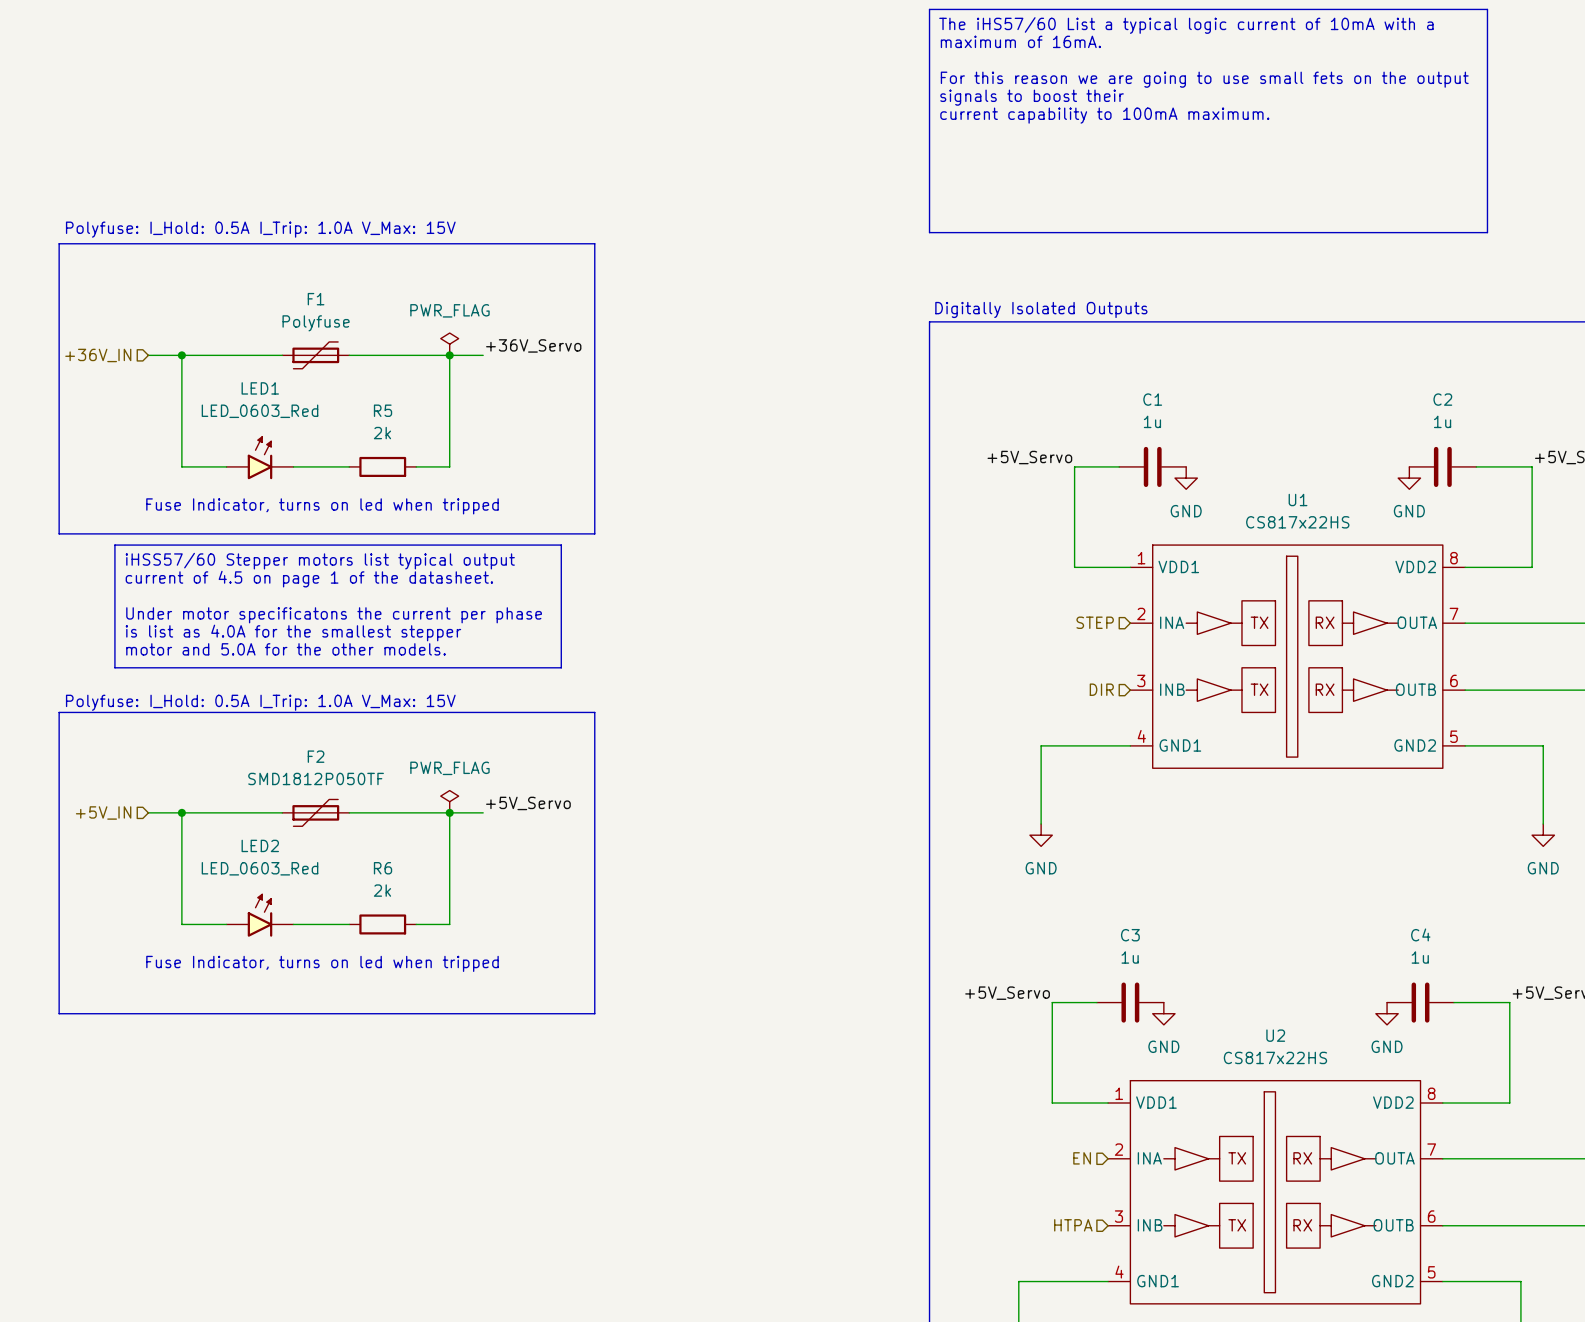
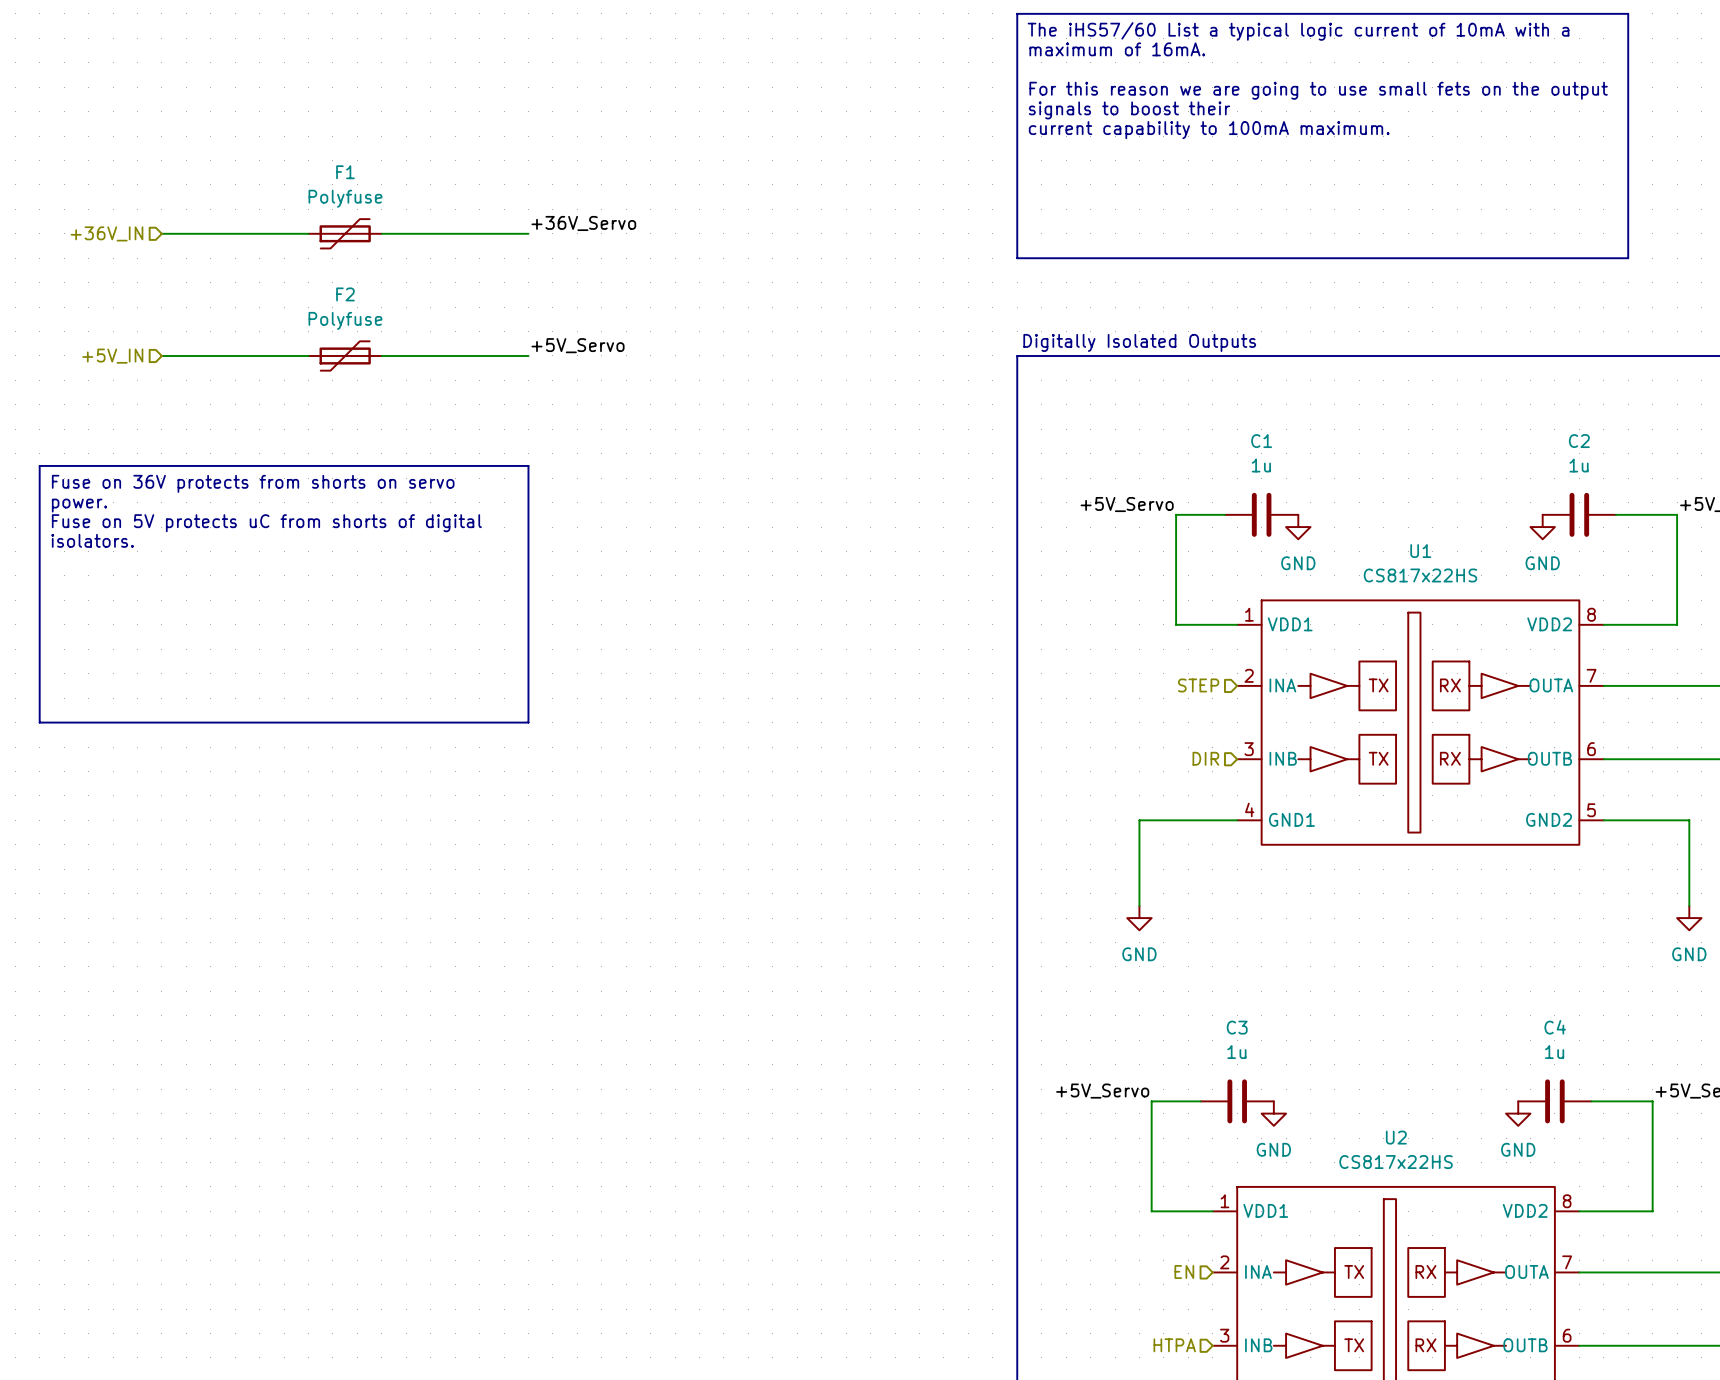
wire: none -> (161, 233) (308, 233)
wire: none -> (381, 233) (528, 233)
text: Polyfuse: I_Hold: 0.5A I_Trip: 1.0A V_Max: 15V (260, 229) -> none
line: (59, 243) (59, 533) (594, 533) (594, 243) (59, 243) -> none
label: none -> +5V_Servo (578, 345)
hierarchical label: none -> +5V_IN (112, 356)
power symbol: PWR_FLAG (449, 344) -> none
label position: +36V_Servo (533, 345) -> +36V_Servo (583, 223)
hierarchical label position: +36V_IN (98, 355) -> +36V_IN (106, 233)
wire: (148, 355) (282, 355) -> (161, 355) (308, 355)
wire: (181, 355) (181, 466) (226, 466) -> none
junction: (181, 355) -> none
F1 position: (315, 355) -> (345, 233)
wire: (349, 355) (483, 355) -> (381, 355) (528, 355)
wire: (449, 355) (449, 466) (416, 466) -> none
junction: (449, 355) -> none
line: none -> (39, 465) (528, 465) (528, 722) (39, 722) (39, 465)
text: none -> Fuse on 36V protects from shorts on servo (253, 483)
LED1: LED_0603_Red (260, 457) -> none
text: none -> power. (79, 505)
wire: (293, 466) (349, 466) -> none
R5: 2k (382, 466) -> none
text: none -> Fuse on 5V protects uC from shorts of digital (266, 523)
text: none -> isolators. (92, 540)
text: Fuse Indicator, turns on led when tripped (322, 506) -> none
line: (114, 545) (561, 545) (561, 667) (114, 667) (114, 545) -> none
text: iHSS57/60 Stepper motors list typical output (320, 561) -> none
text: current of 4.5 on page 1 of the datasheet. (309, 579) -> none
text: Under motor specificatons the current per phase (334, 615) -> none
text: is list as 4.0A for the smallest stepper (293, 632) -> none
text: motor and 5.0A for the other models. (285, 649) -> none
text: Polyfuse: I_Hold: 0.5A I_Trip: 1.0A V_Max: 15V (260, 702) -> none
line: (59, 712) (594, 712) (594, 1013) (59, 1013) (59, 712) -> none
F2 value: SMD1812P050TF (316, 778) -> Polyfuse (345, 320)
power symbol: PWR_FLAG (449, 801) -> none
label: +5V_Servo (528, 803) -> none
hierarchical label: +5V_IN (103, 812) -> none
wire: (148, 812) (282, 812) -> none
wire: (181, 812) (181, 924) (226, 924) -> none
junction: (181, 812) -> none
F2 position: (315, 812) -> (345, 355)
wire: (349, 812) (483, 812) -> none
wire: (449, 812) (449, 924) (416, 924) -> none
junction: (449, 812) -> none
LED2: LED_0603_Red (260, 915) -> none
wire: (293, 924) (349, 924) -> none
R6: 2k (382, 924) -> none
text: Fuse Indicator, turns on led when tripped (322, 963) -> none

